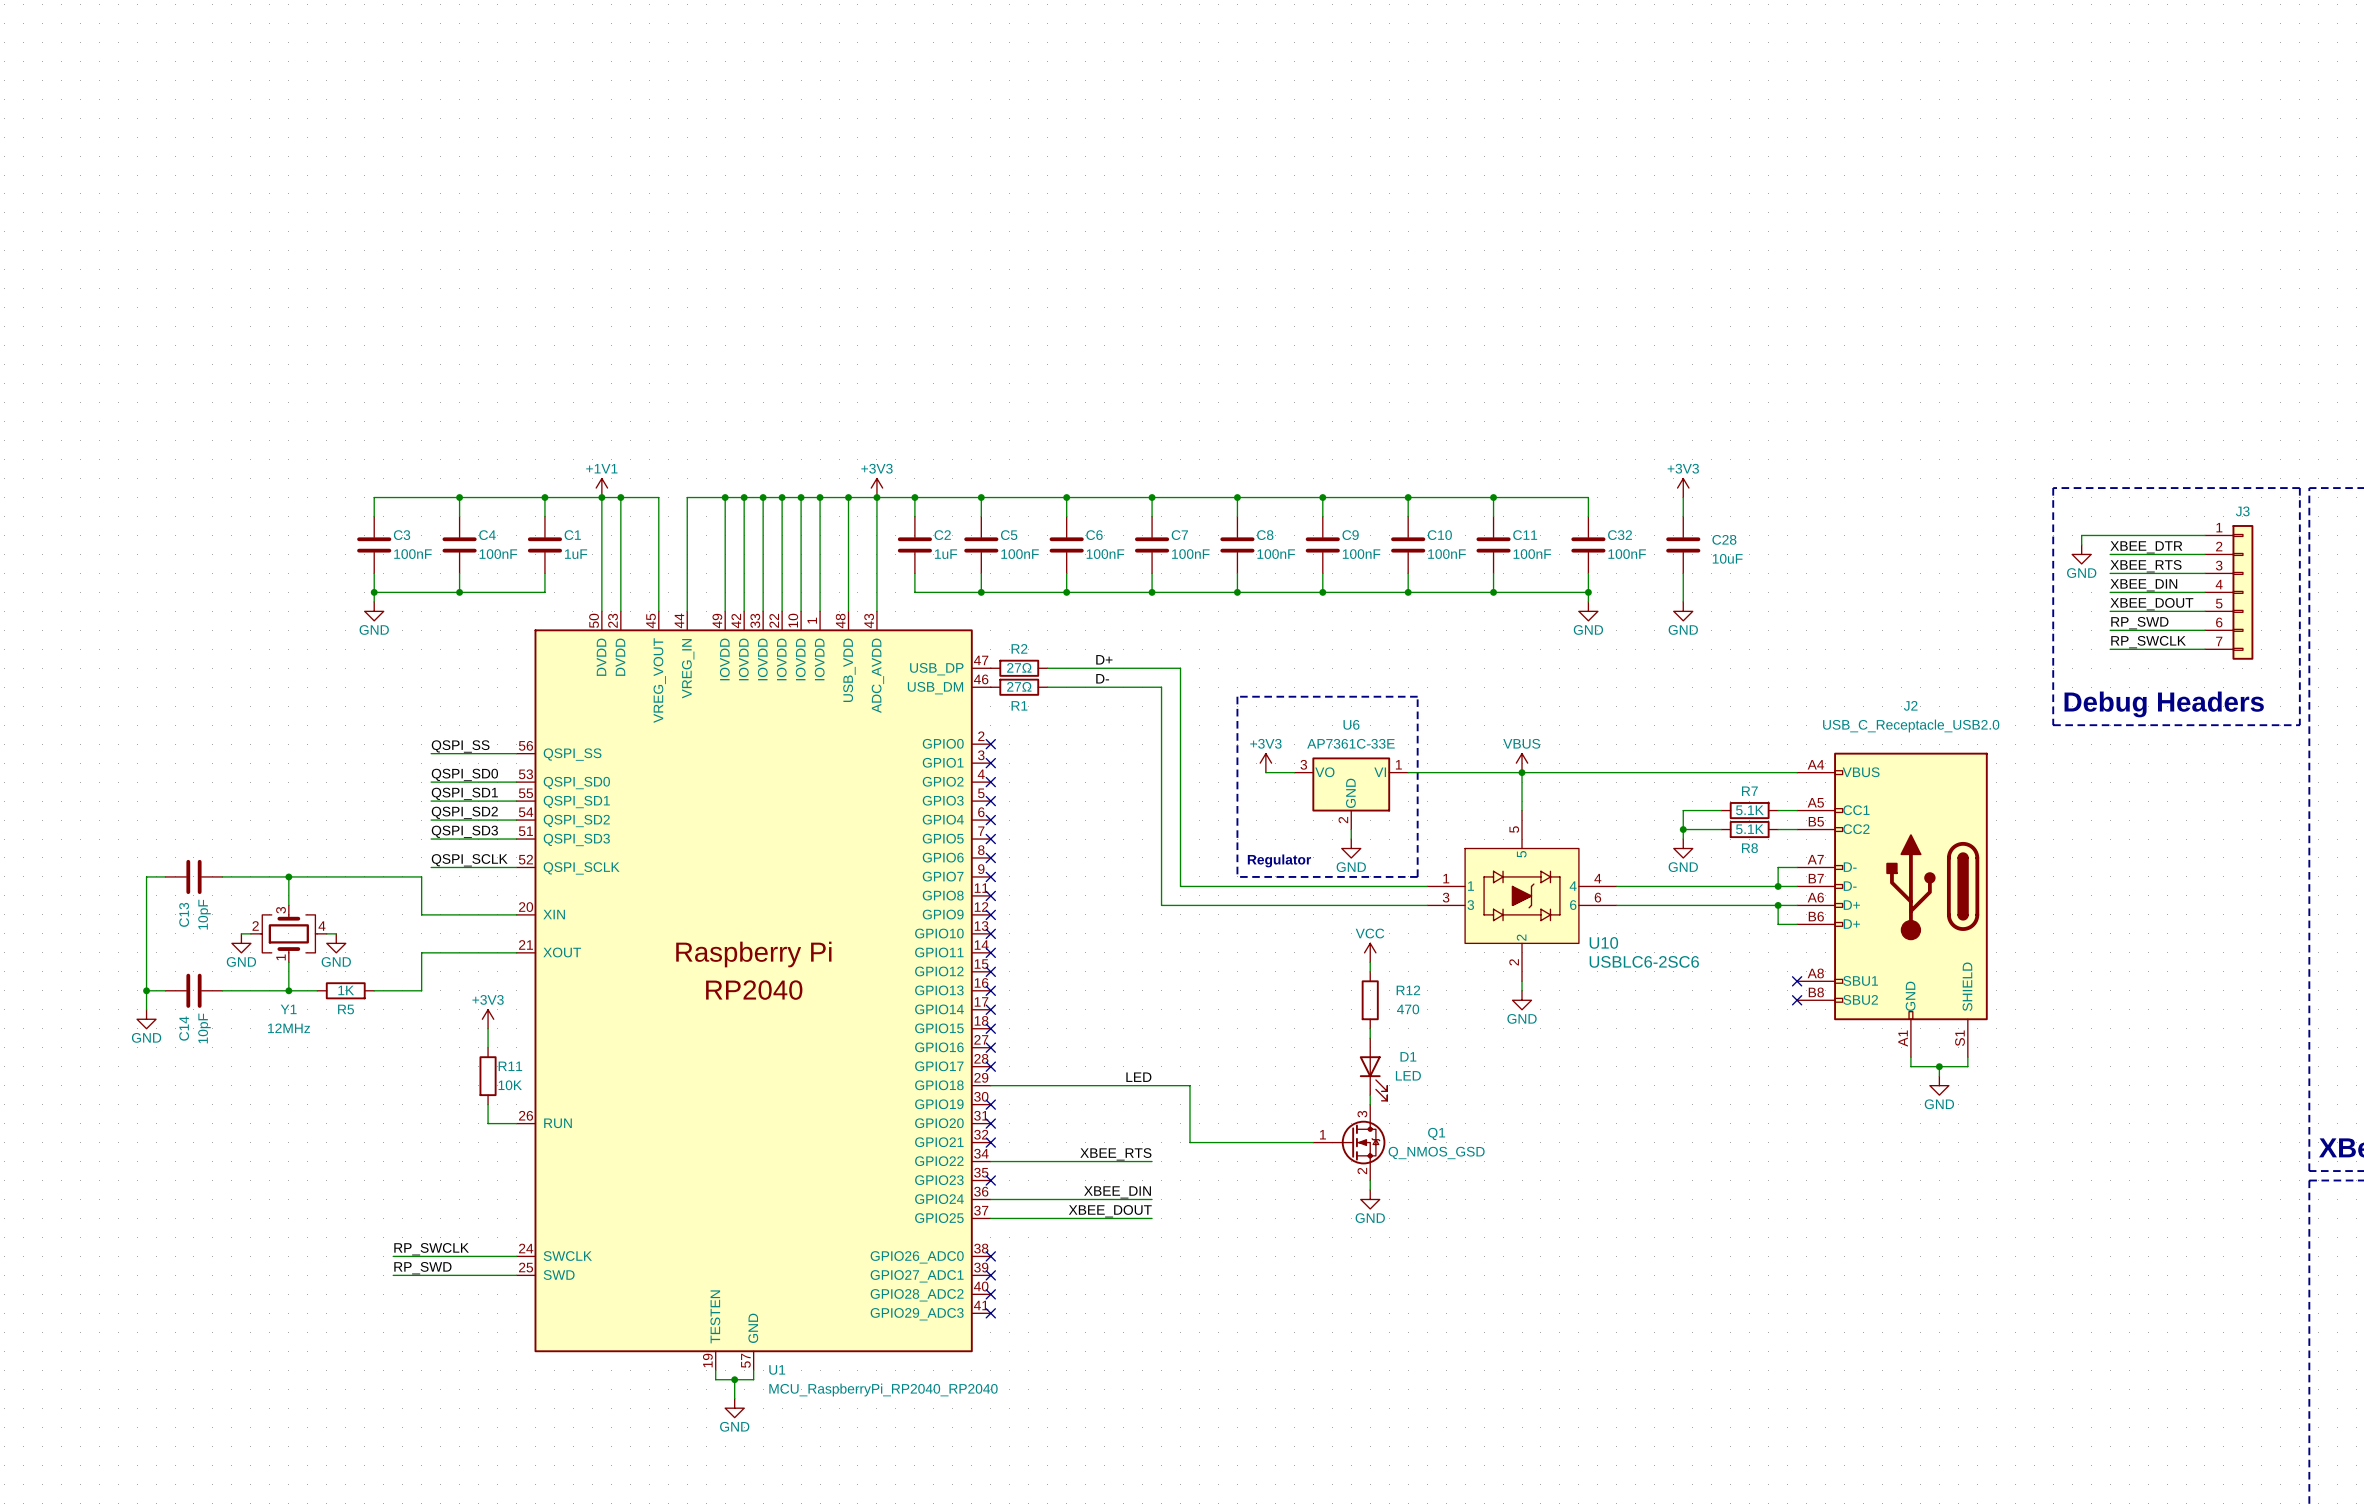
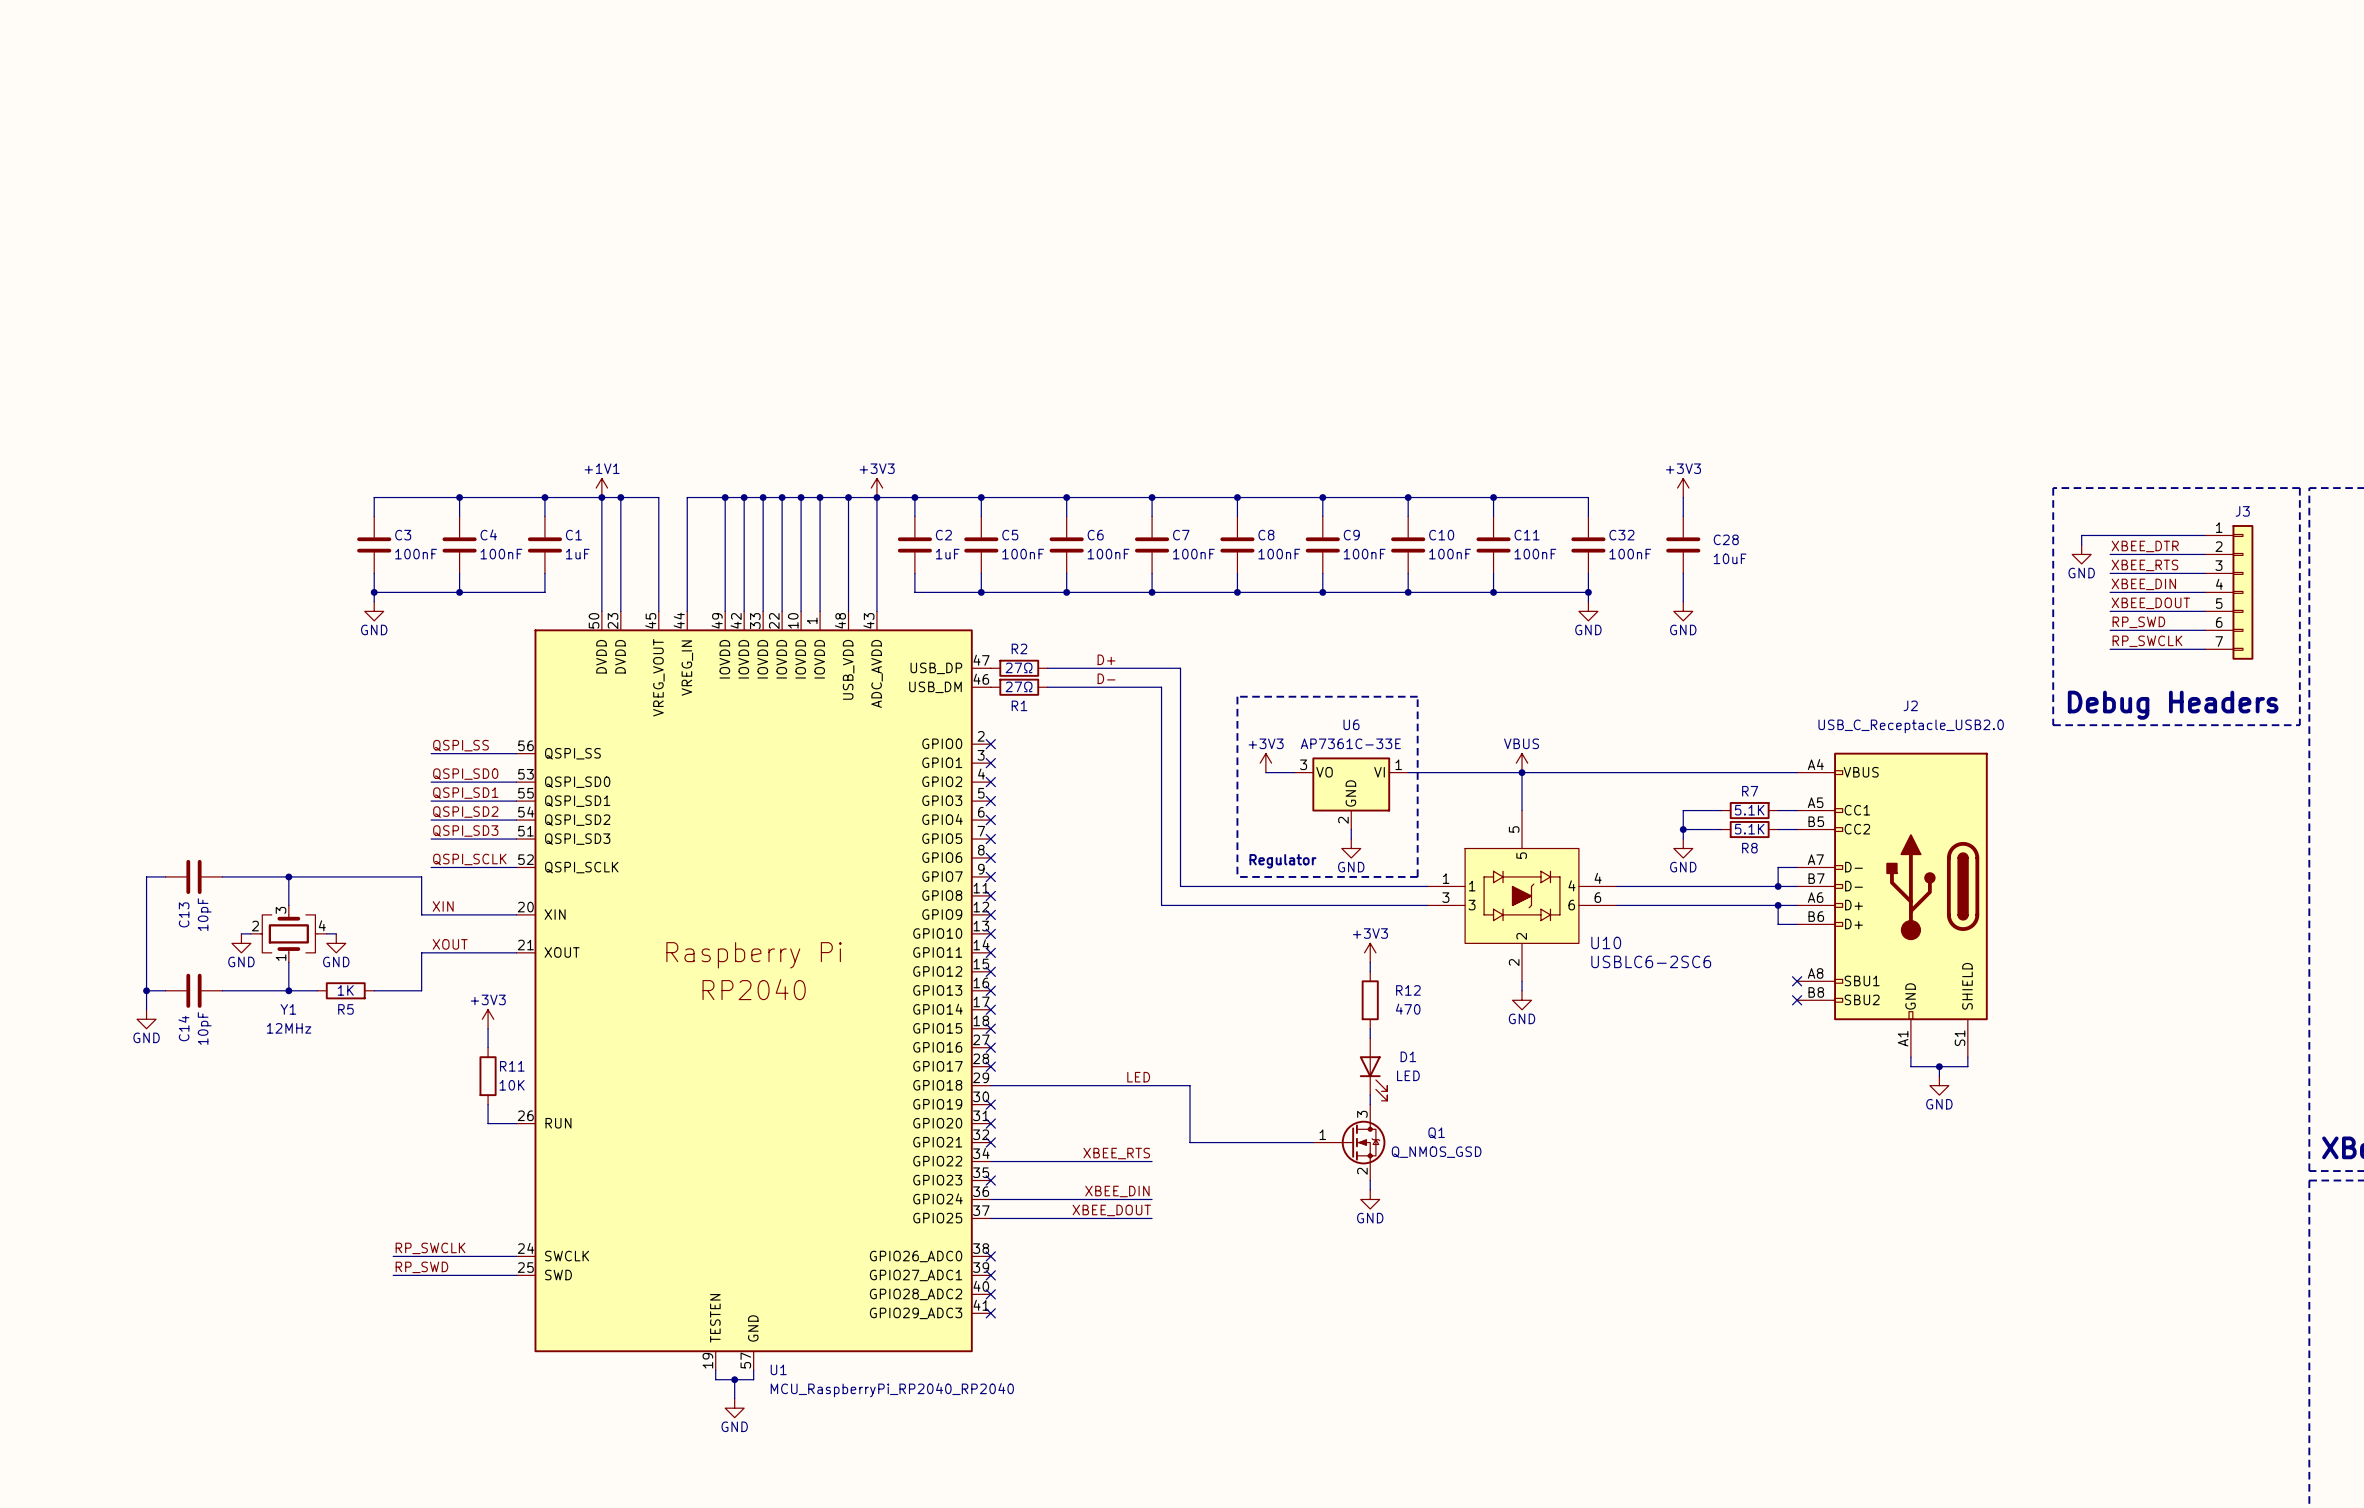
label: none -> XIN (443, 906)
label: none -> XOUT (450, 944)
power symbol: VCC (1370, 952) -> +3V3 (1370, 952)

